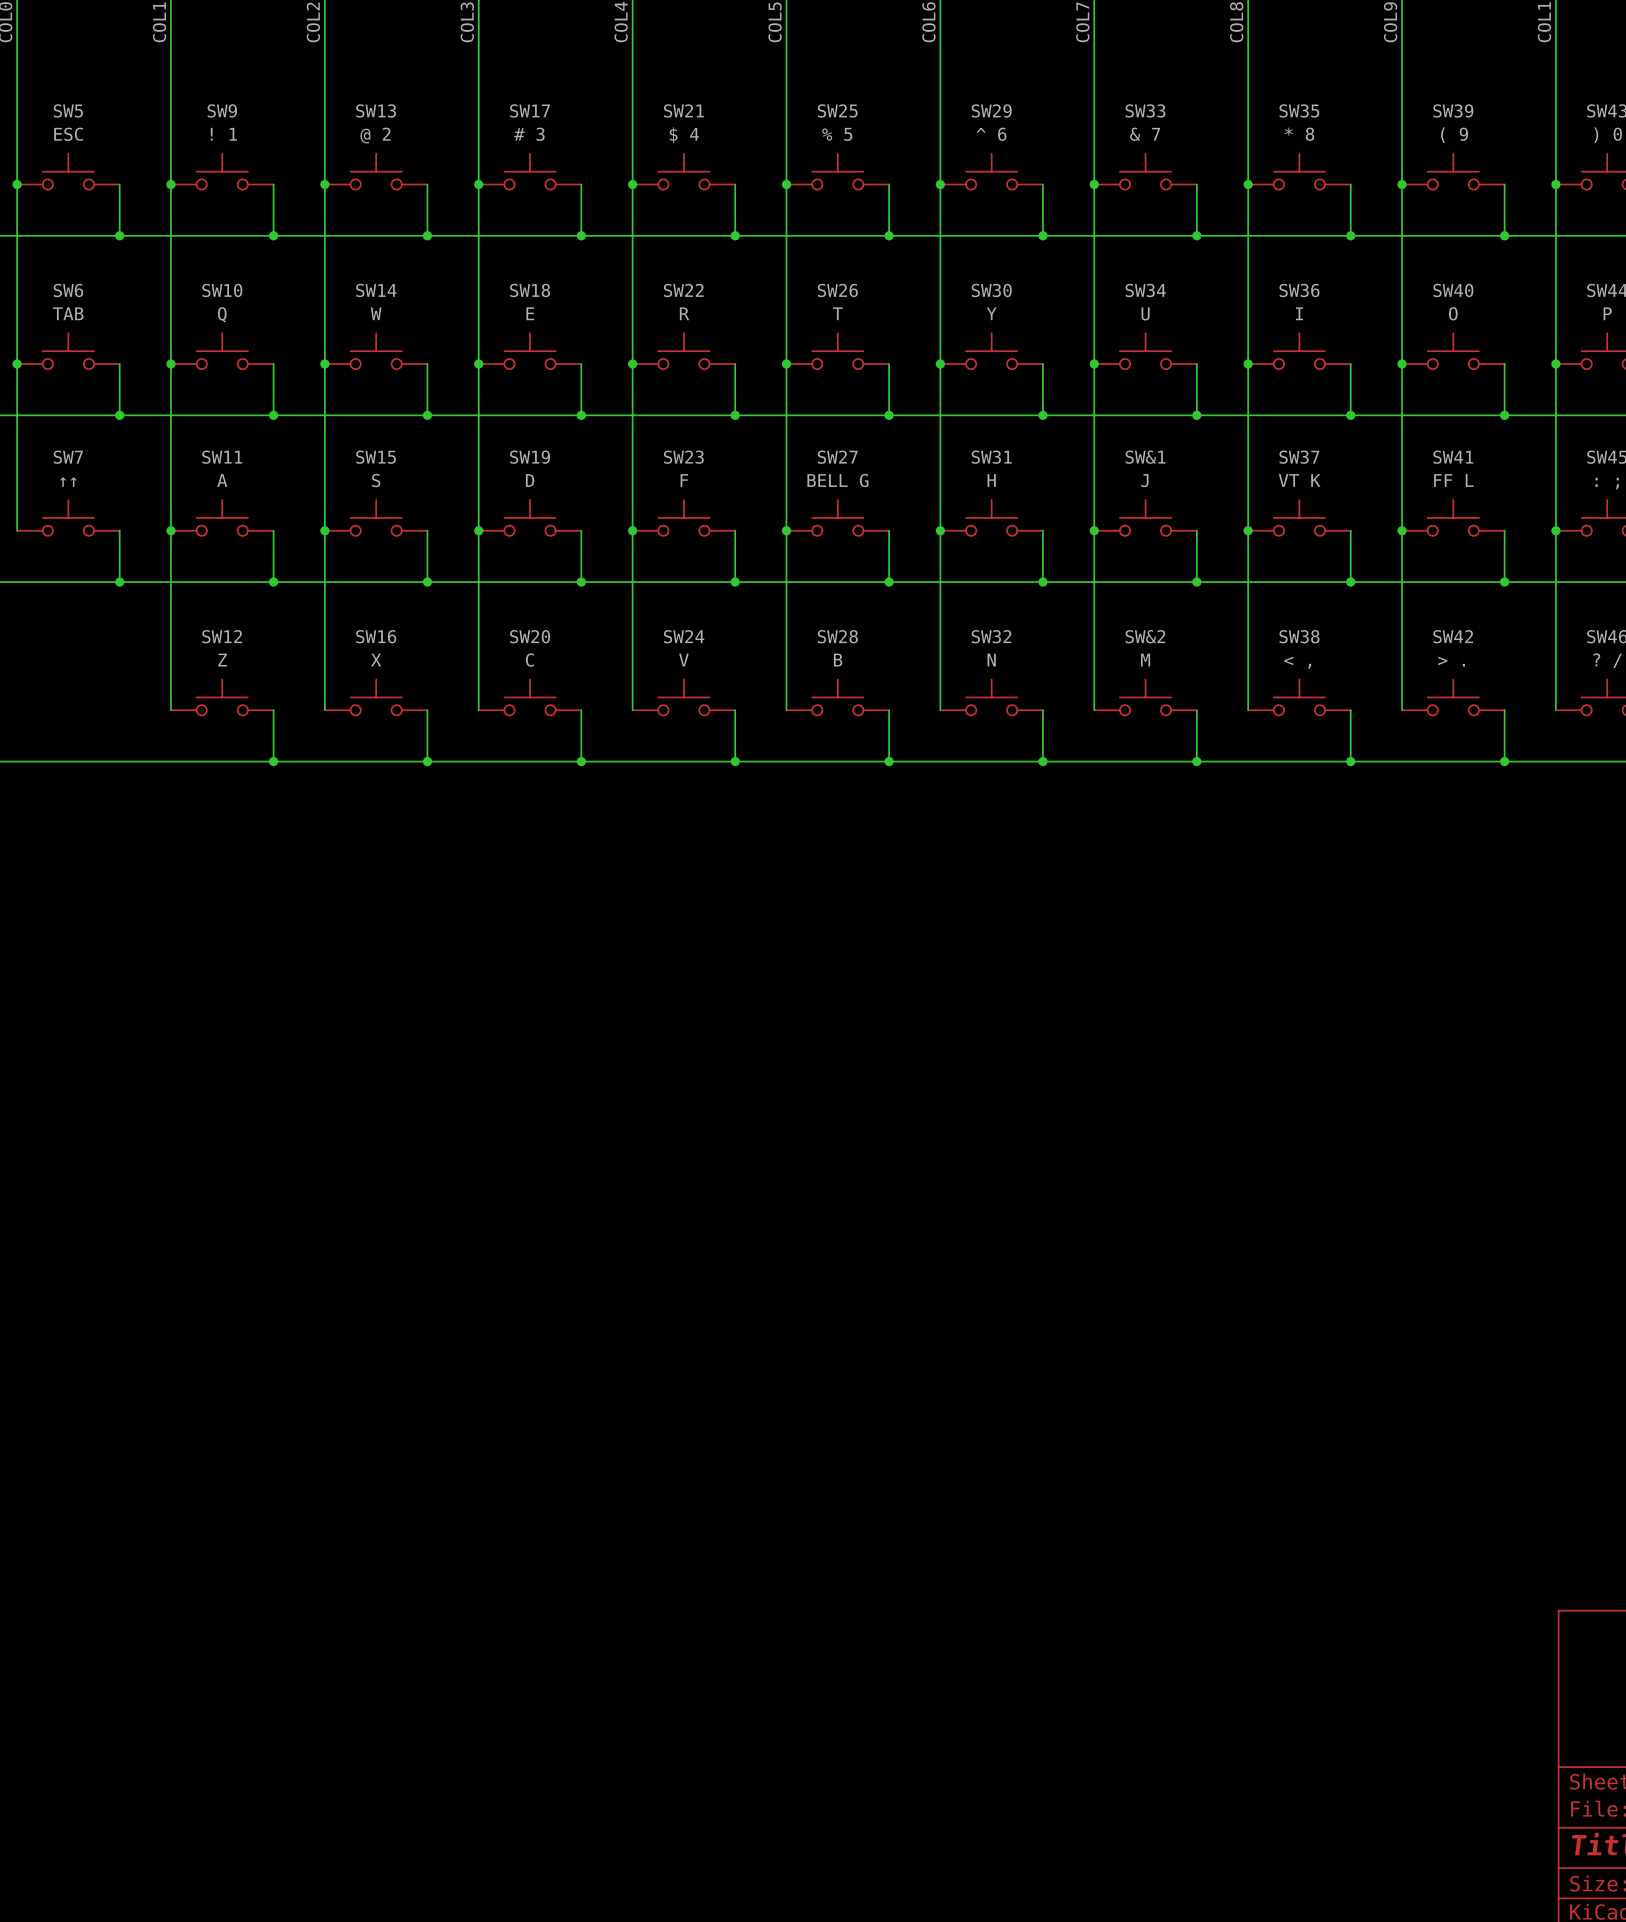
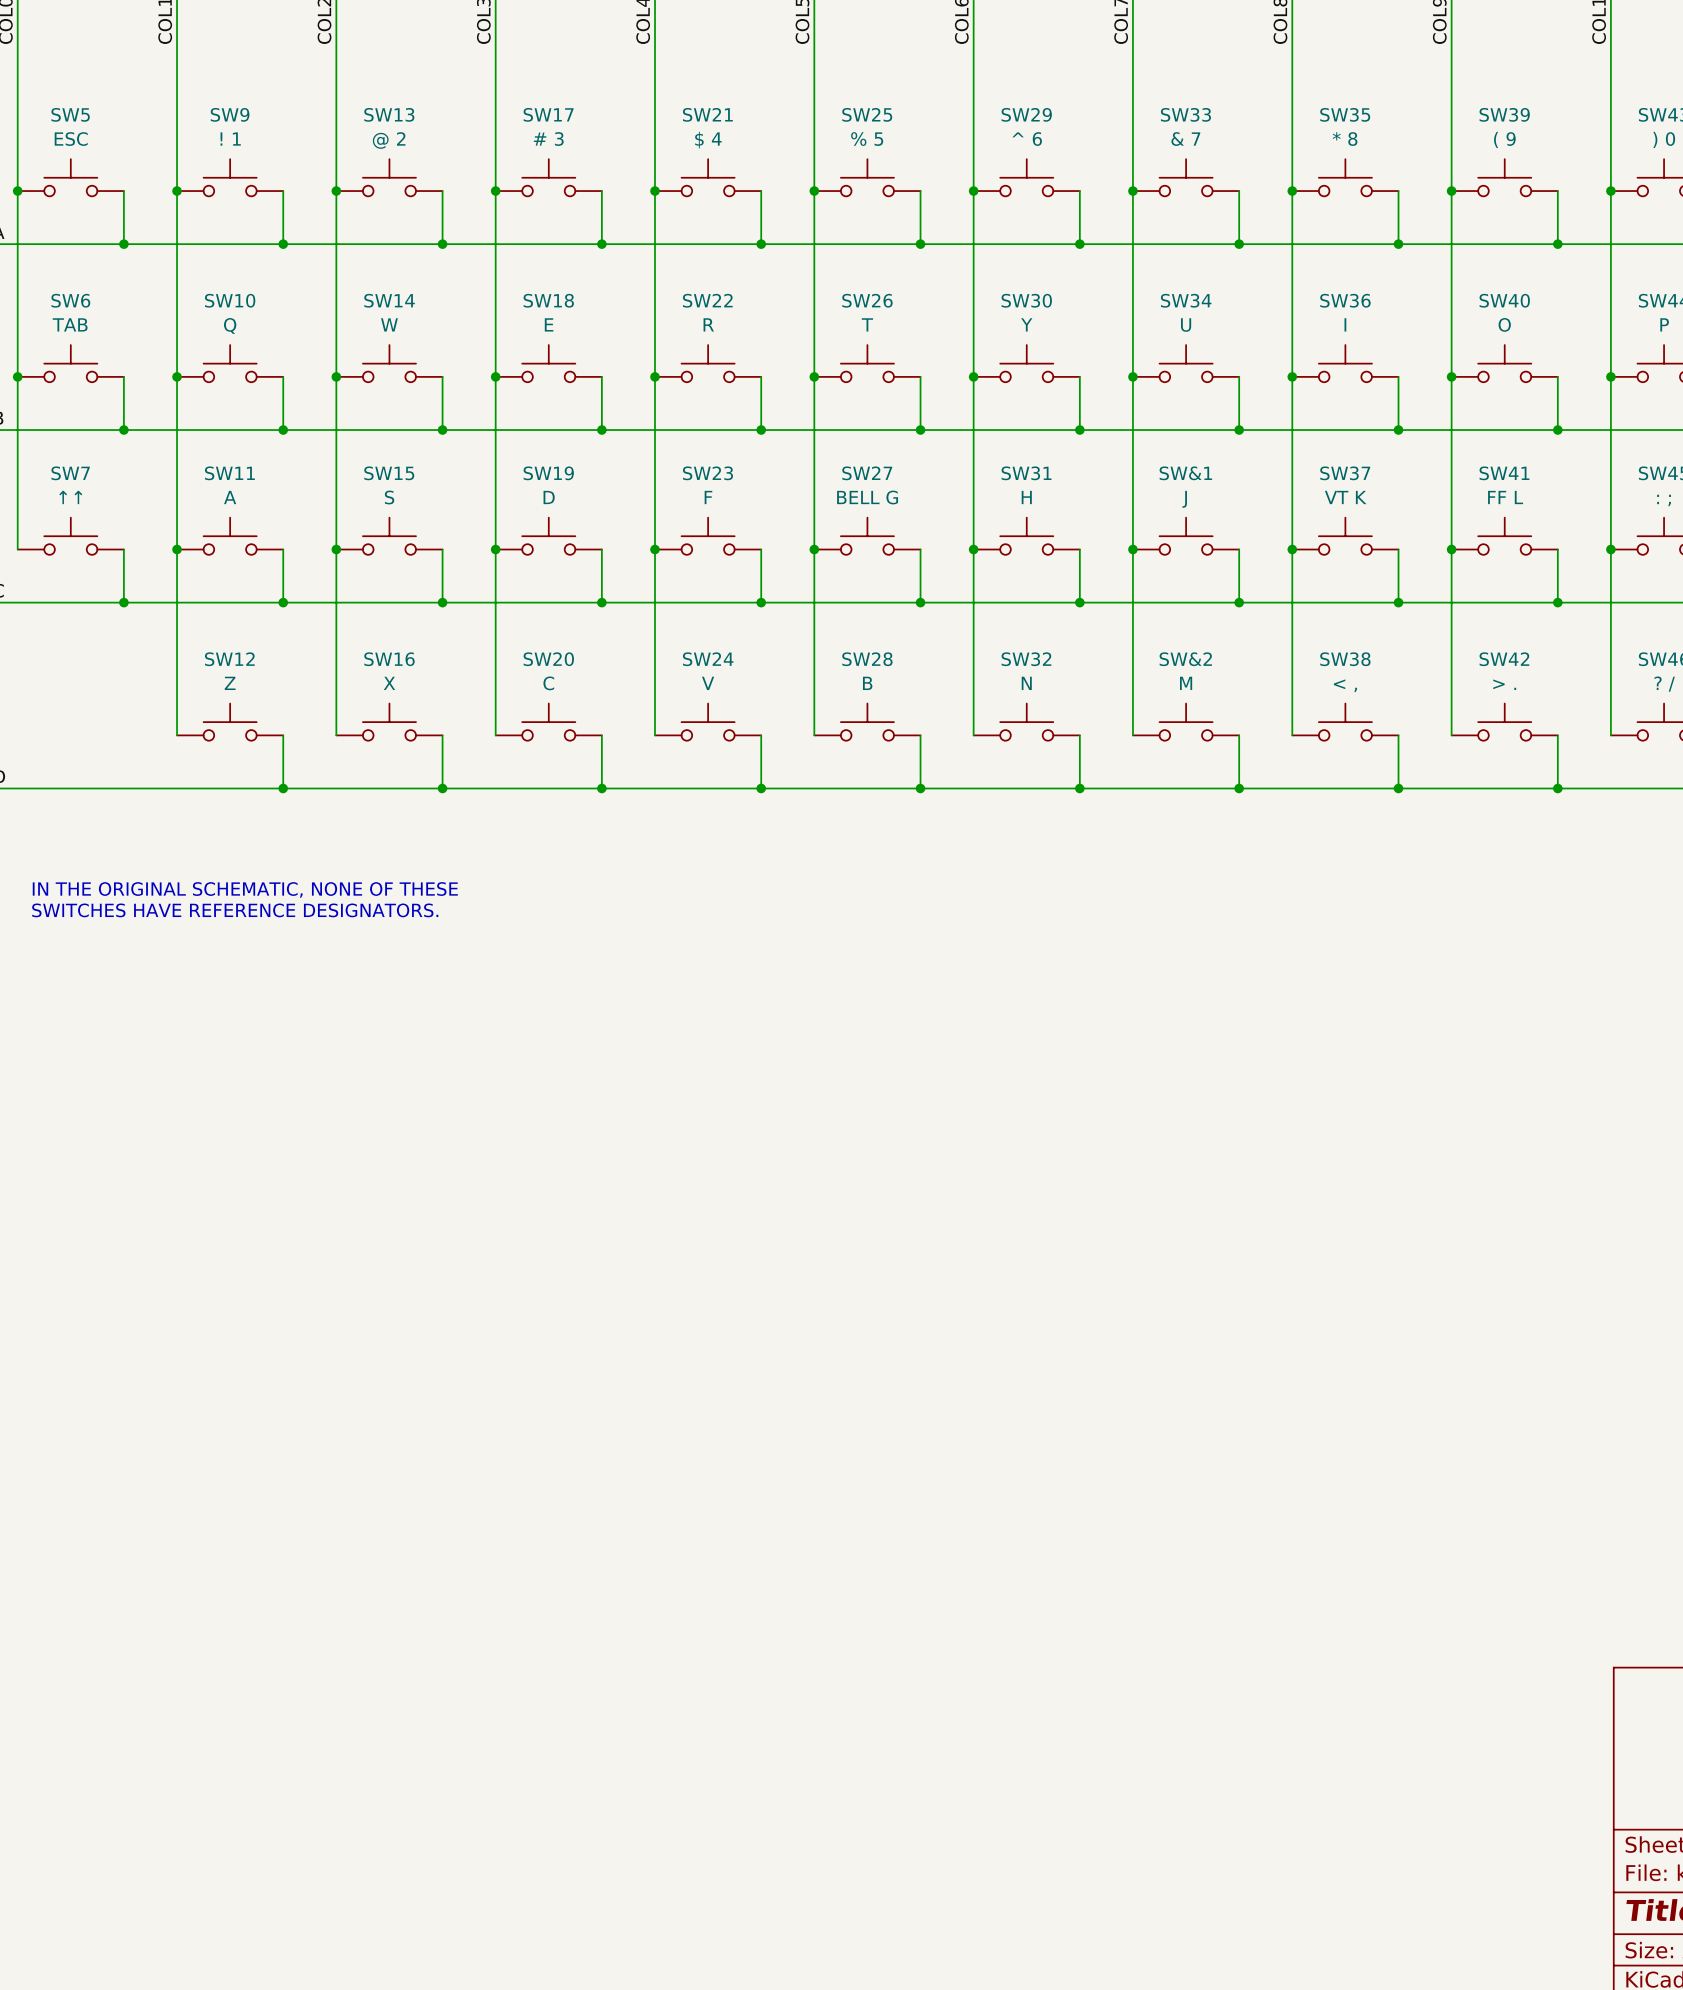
text: none -> IN THE ORIGINAL SCHEMATIC, NONE OF THESE (245, 889)
text: none -> SWITCHES HAVE REFERENCE DESIGNATORS. (235, 910)

